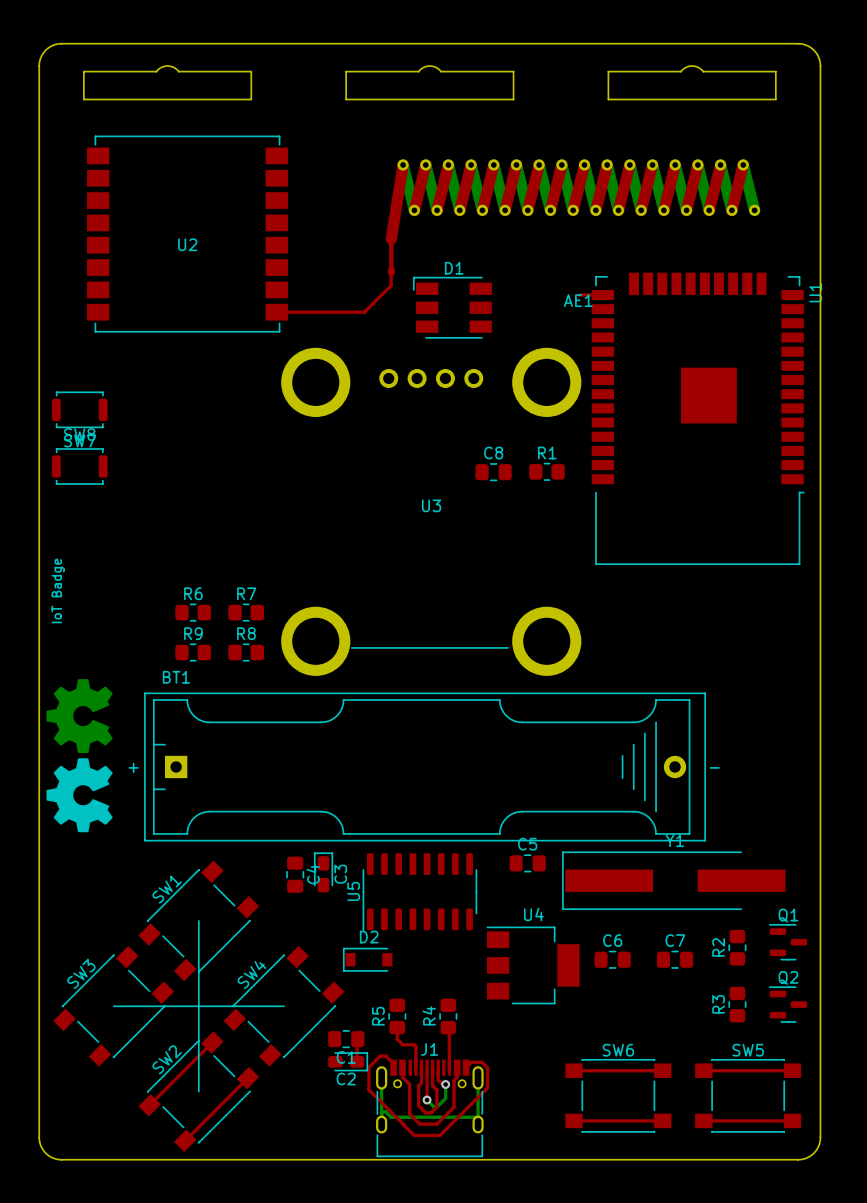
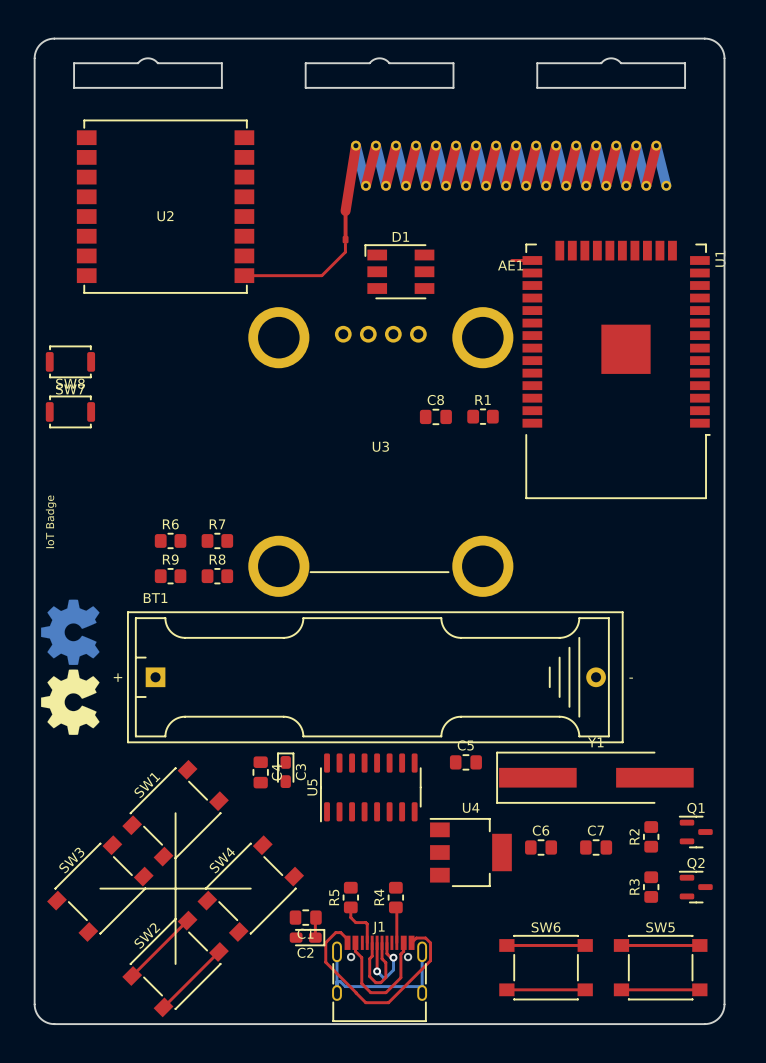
D2: (367, 959) -> none

